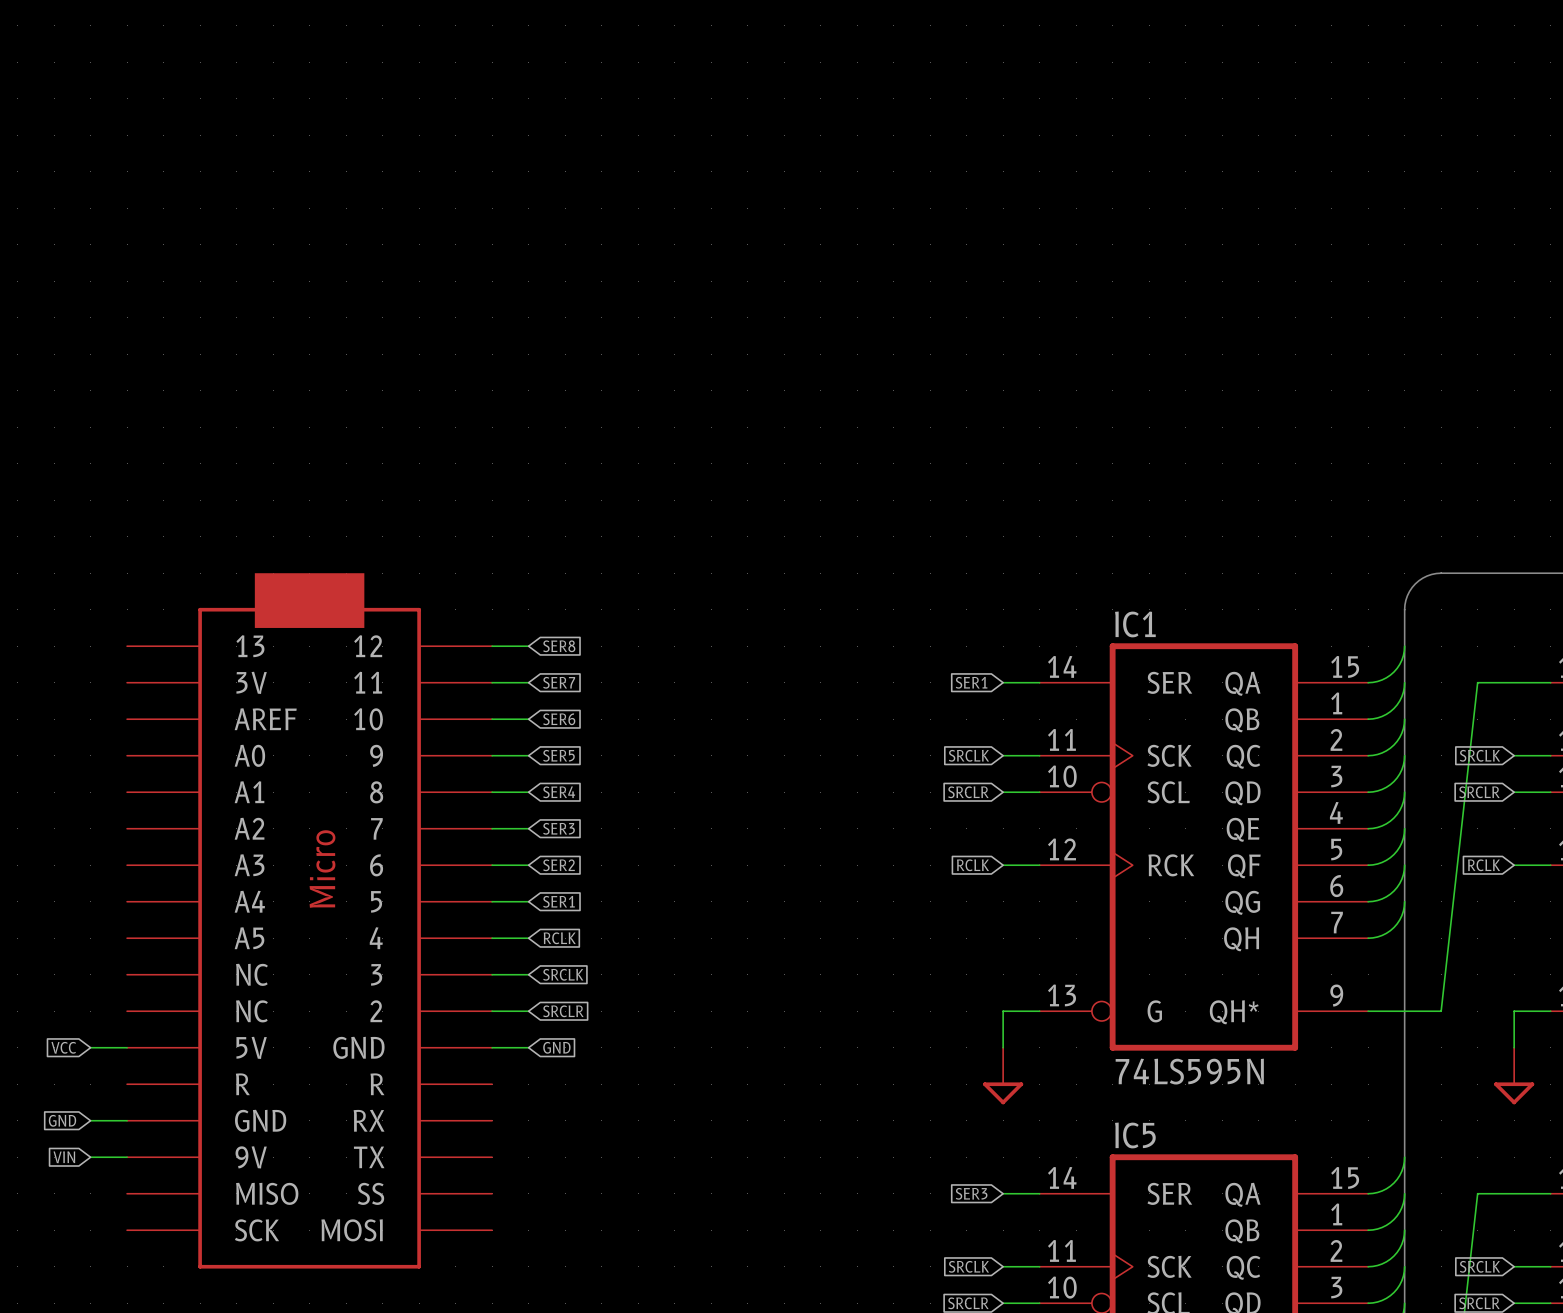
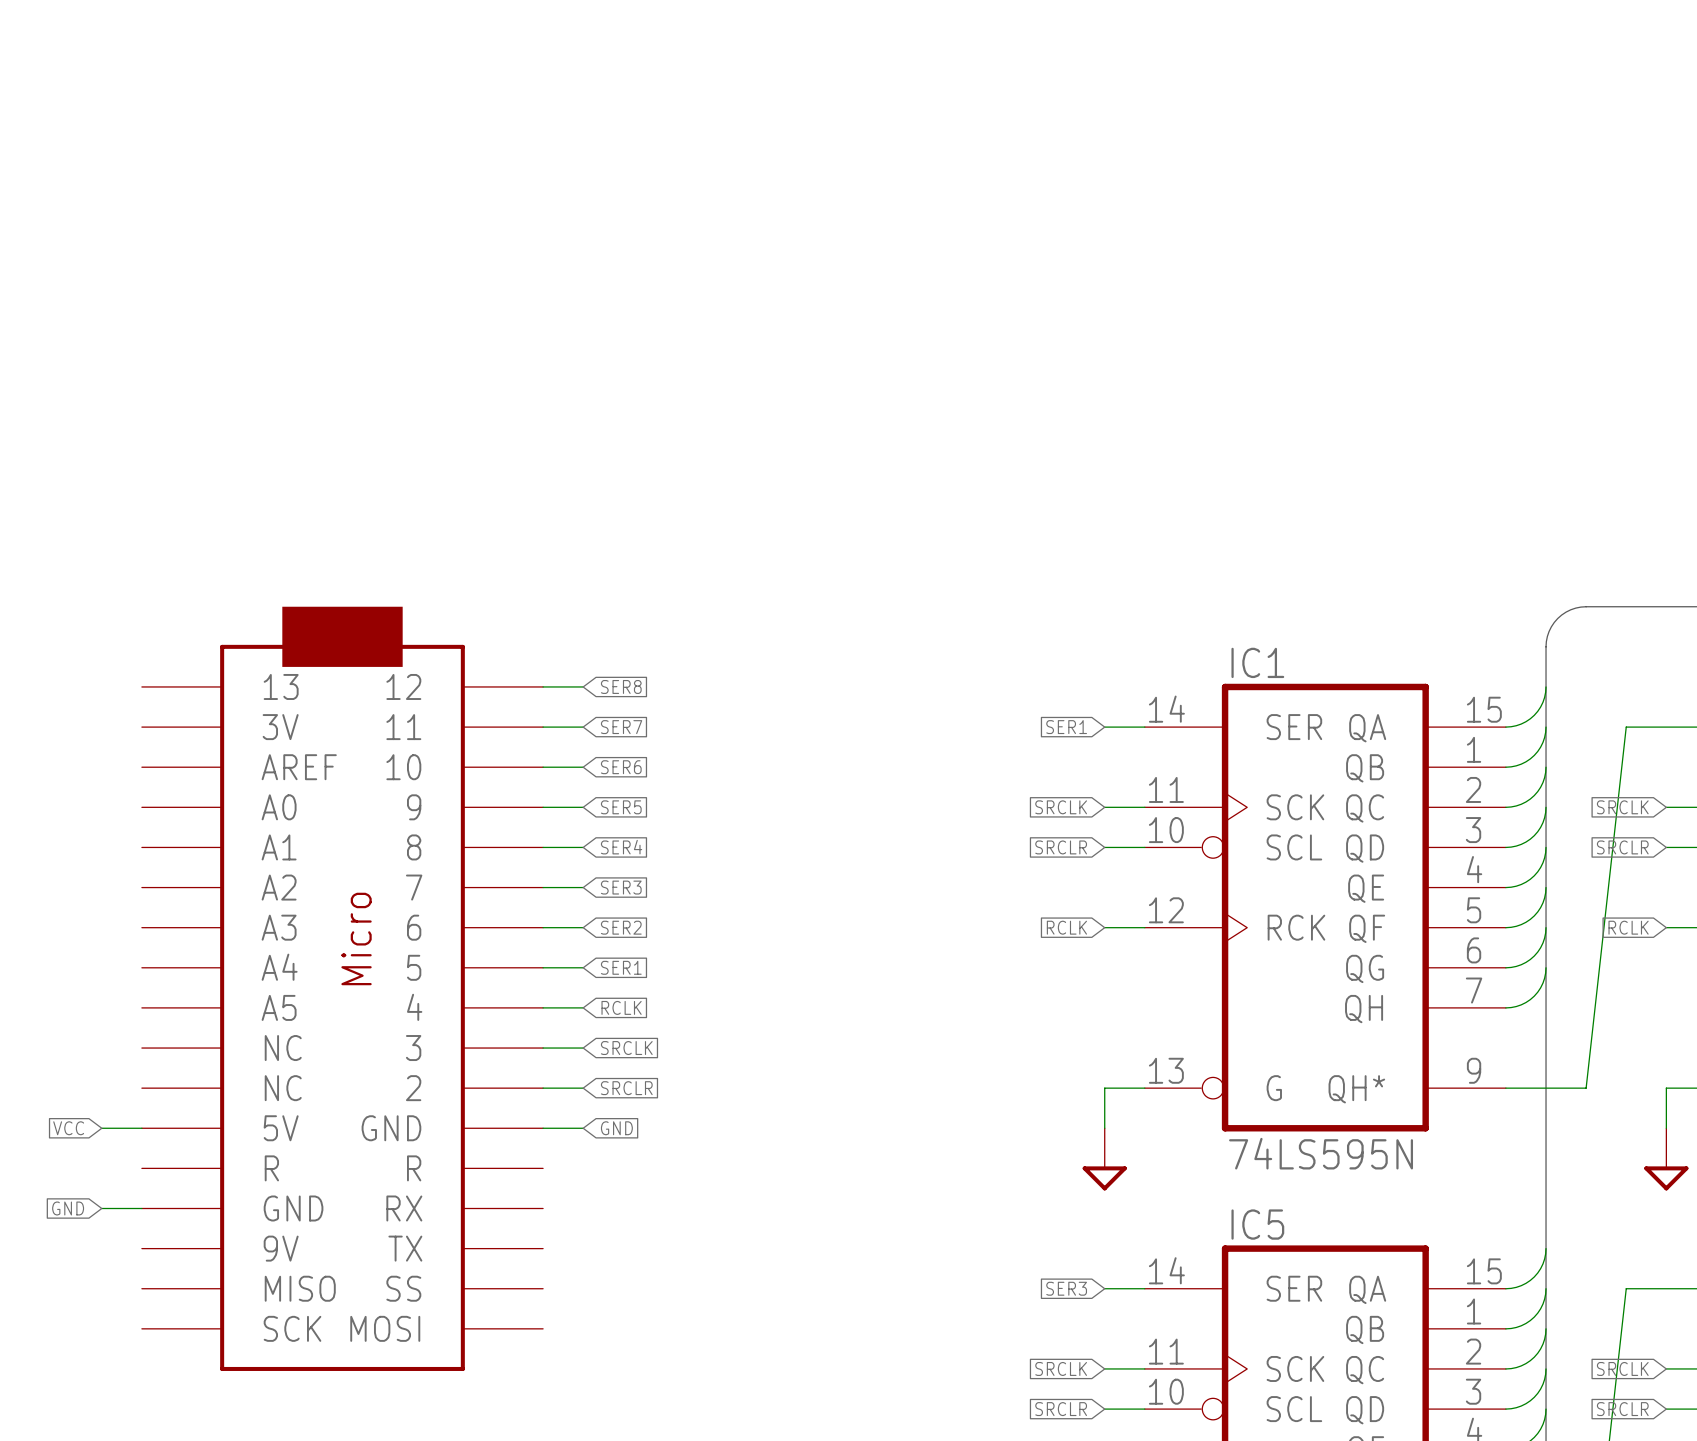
global label: VIN (64, 1157) -> none
wire: (90, 1157) (127, 1157) -> none

